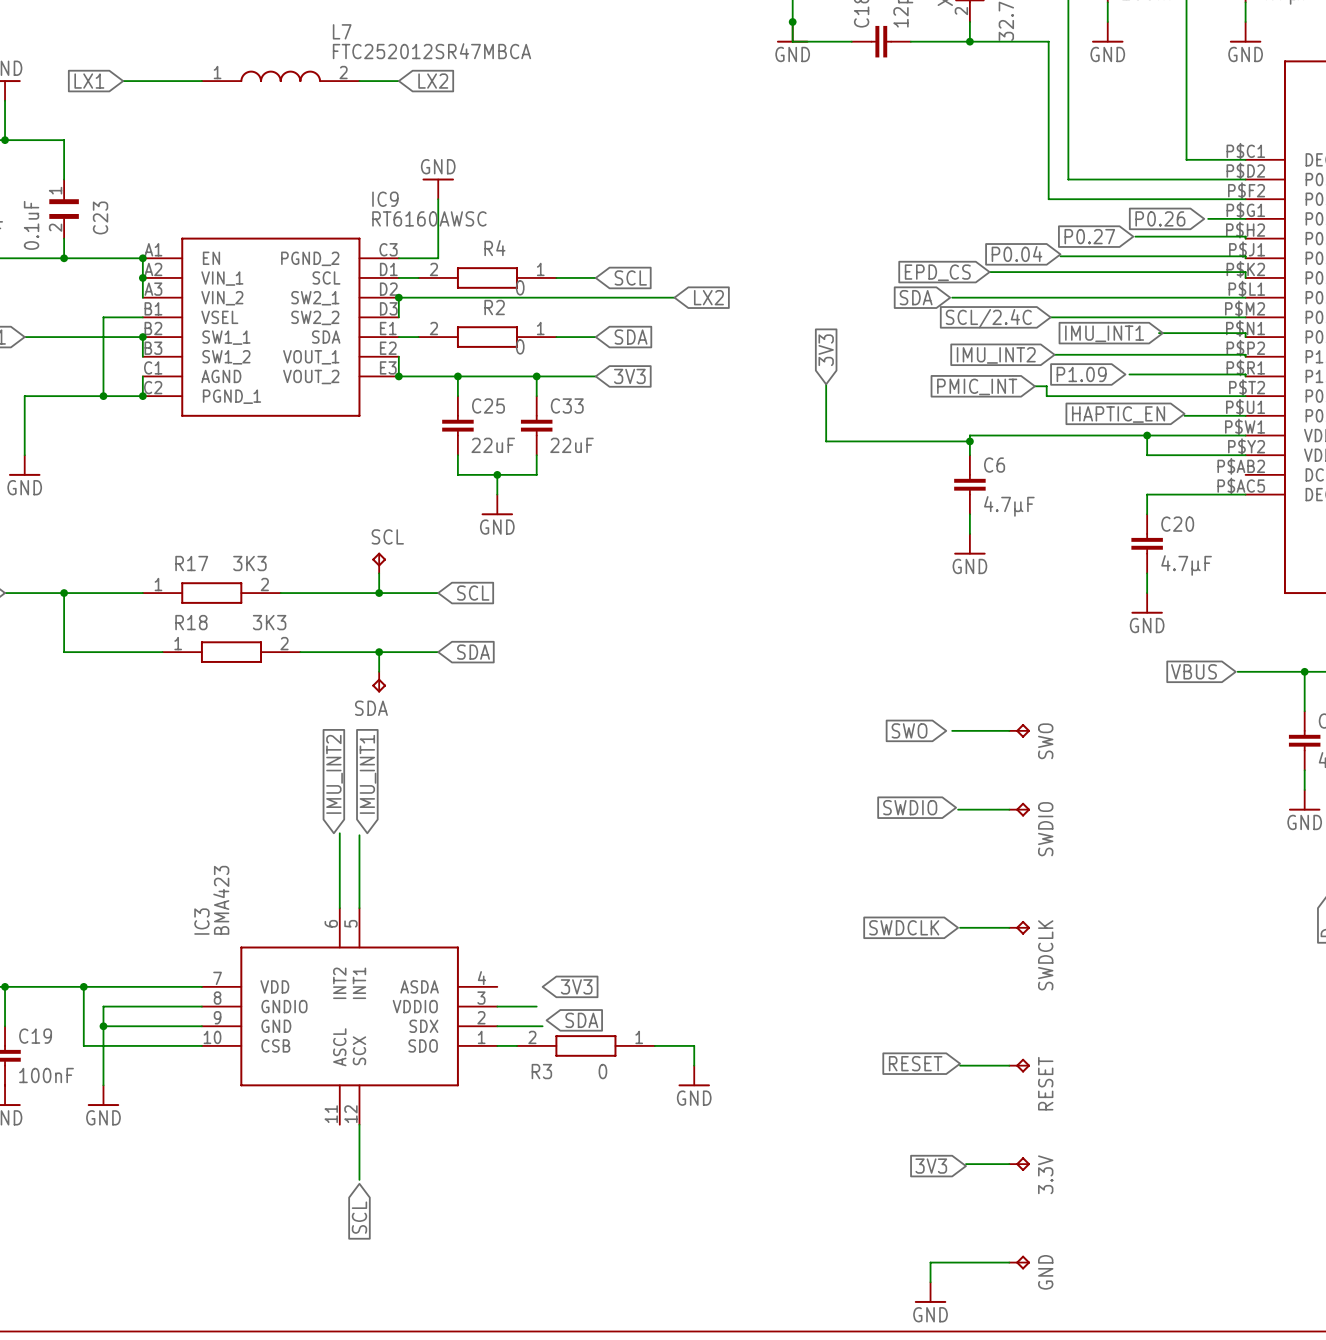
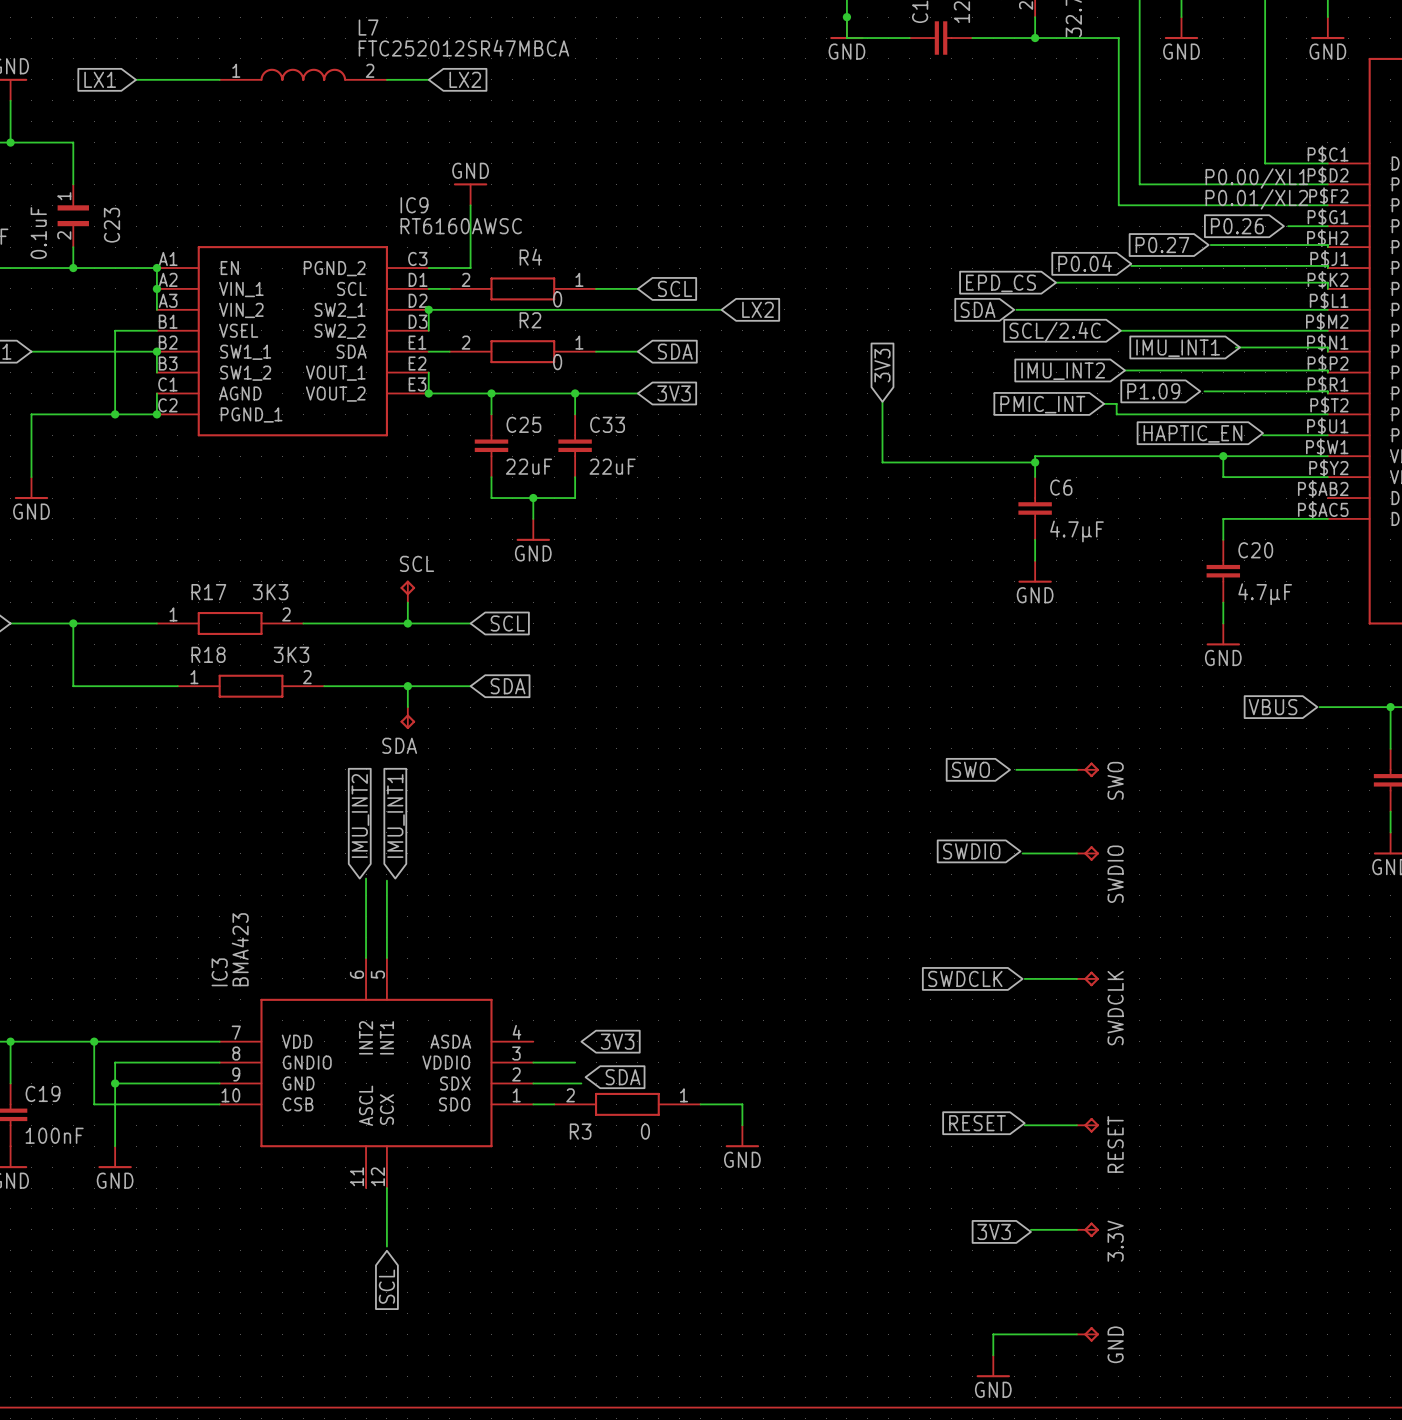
label: none -> P0.00/XL1 (1256, 178)
label: none -> P0.01/XL2 (1256, 199)

